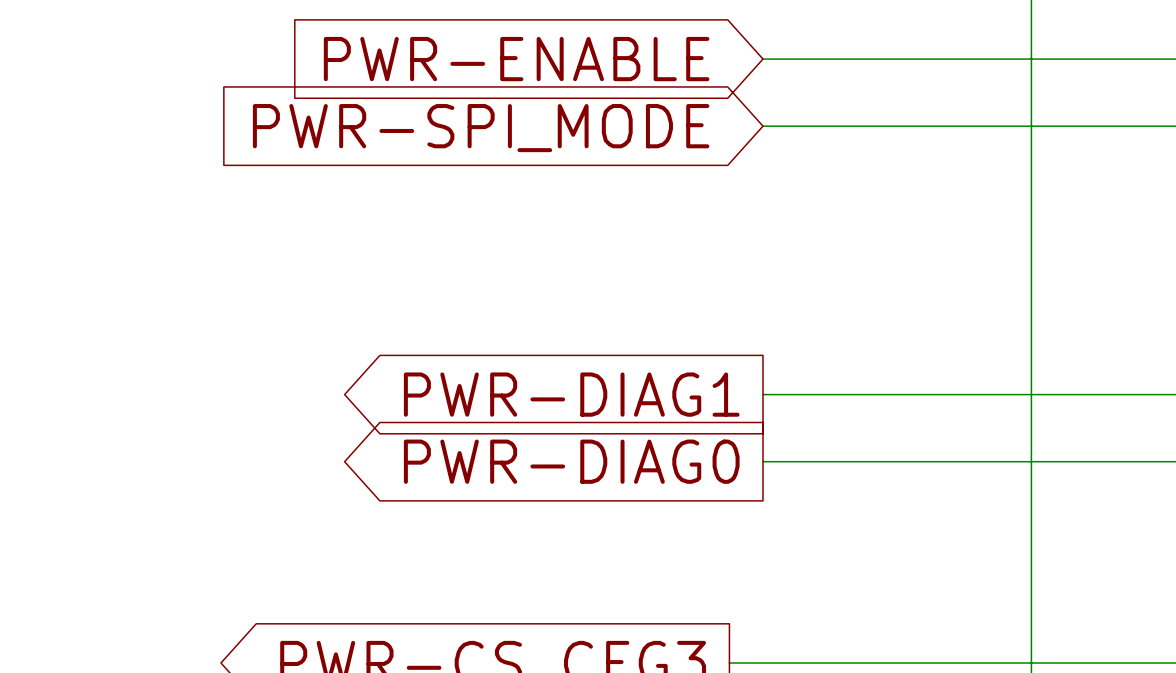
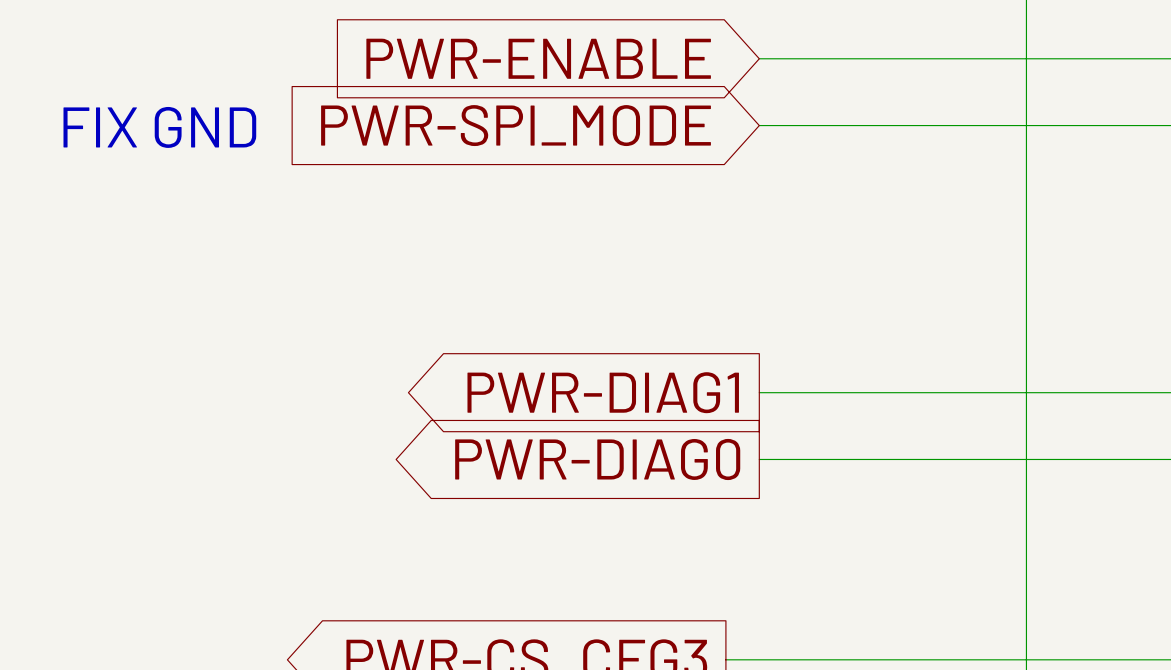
text: none -> FIX GND (159, 127)

